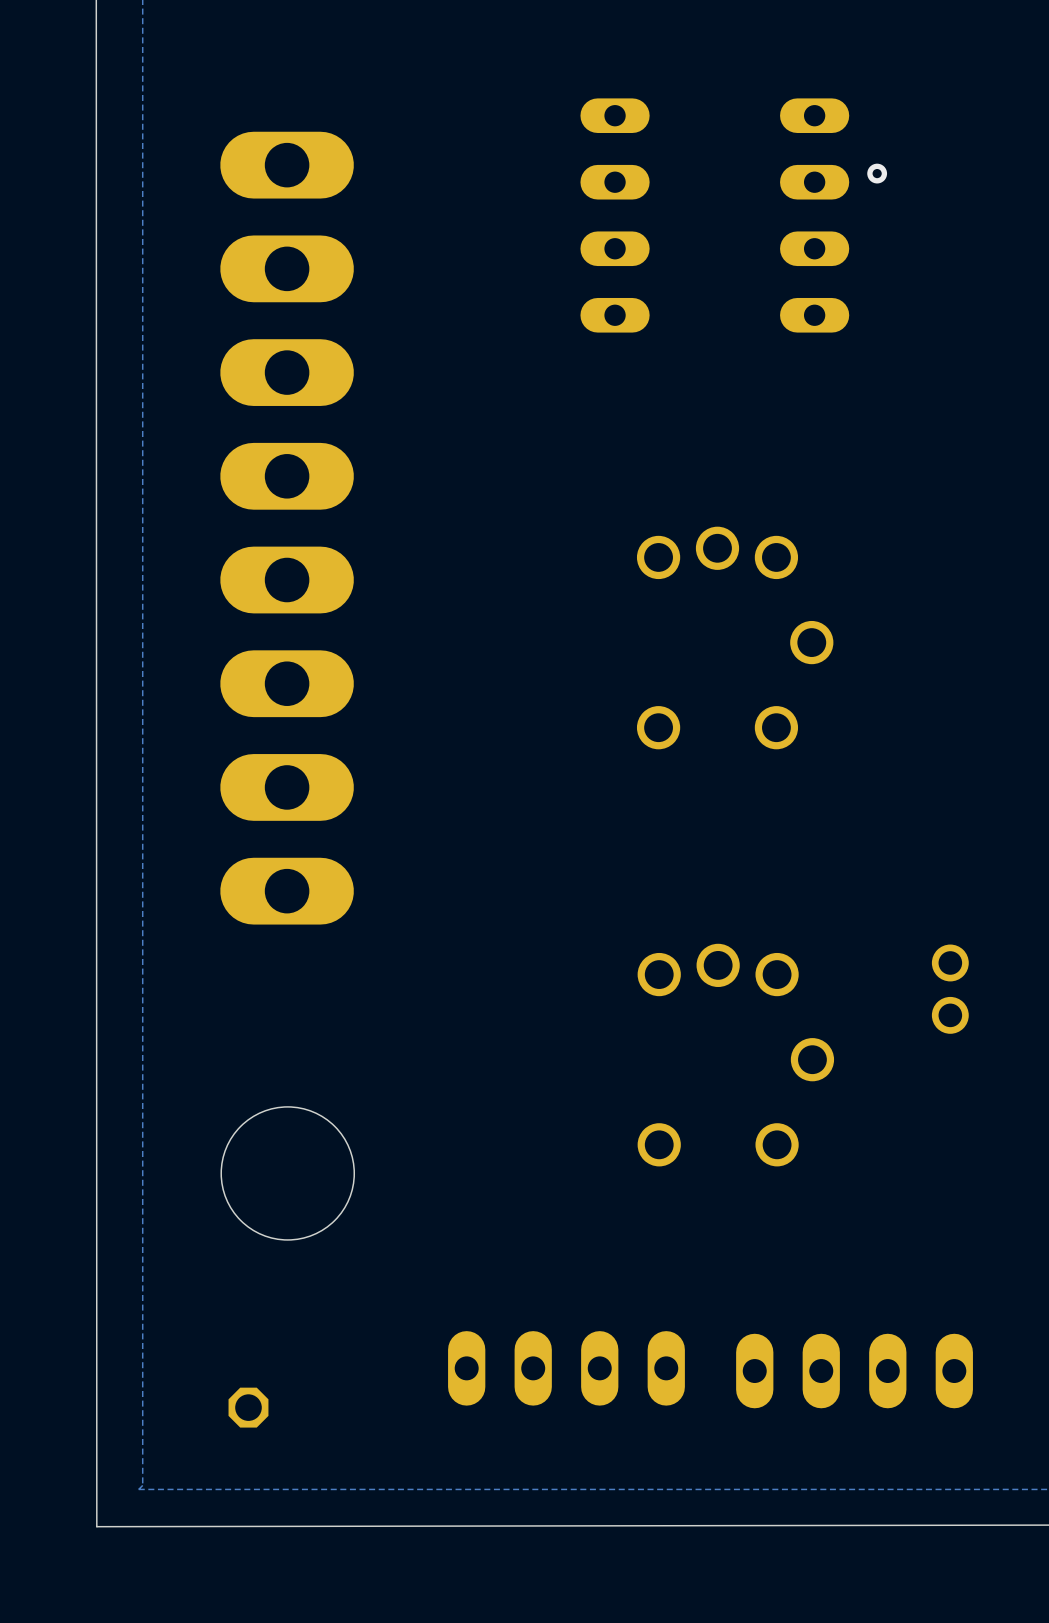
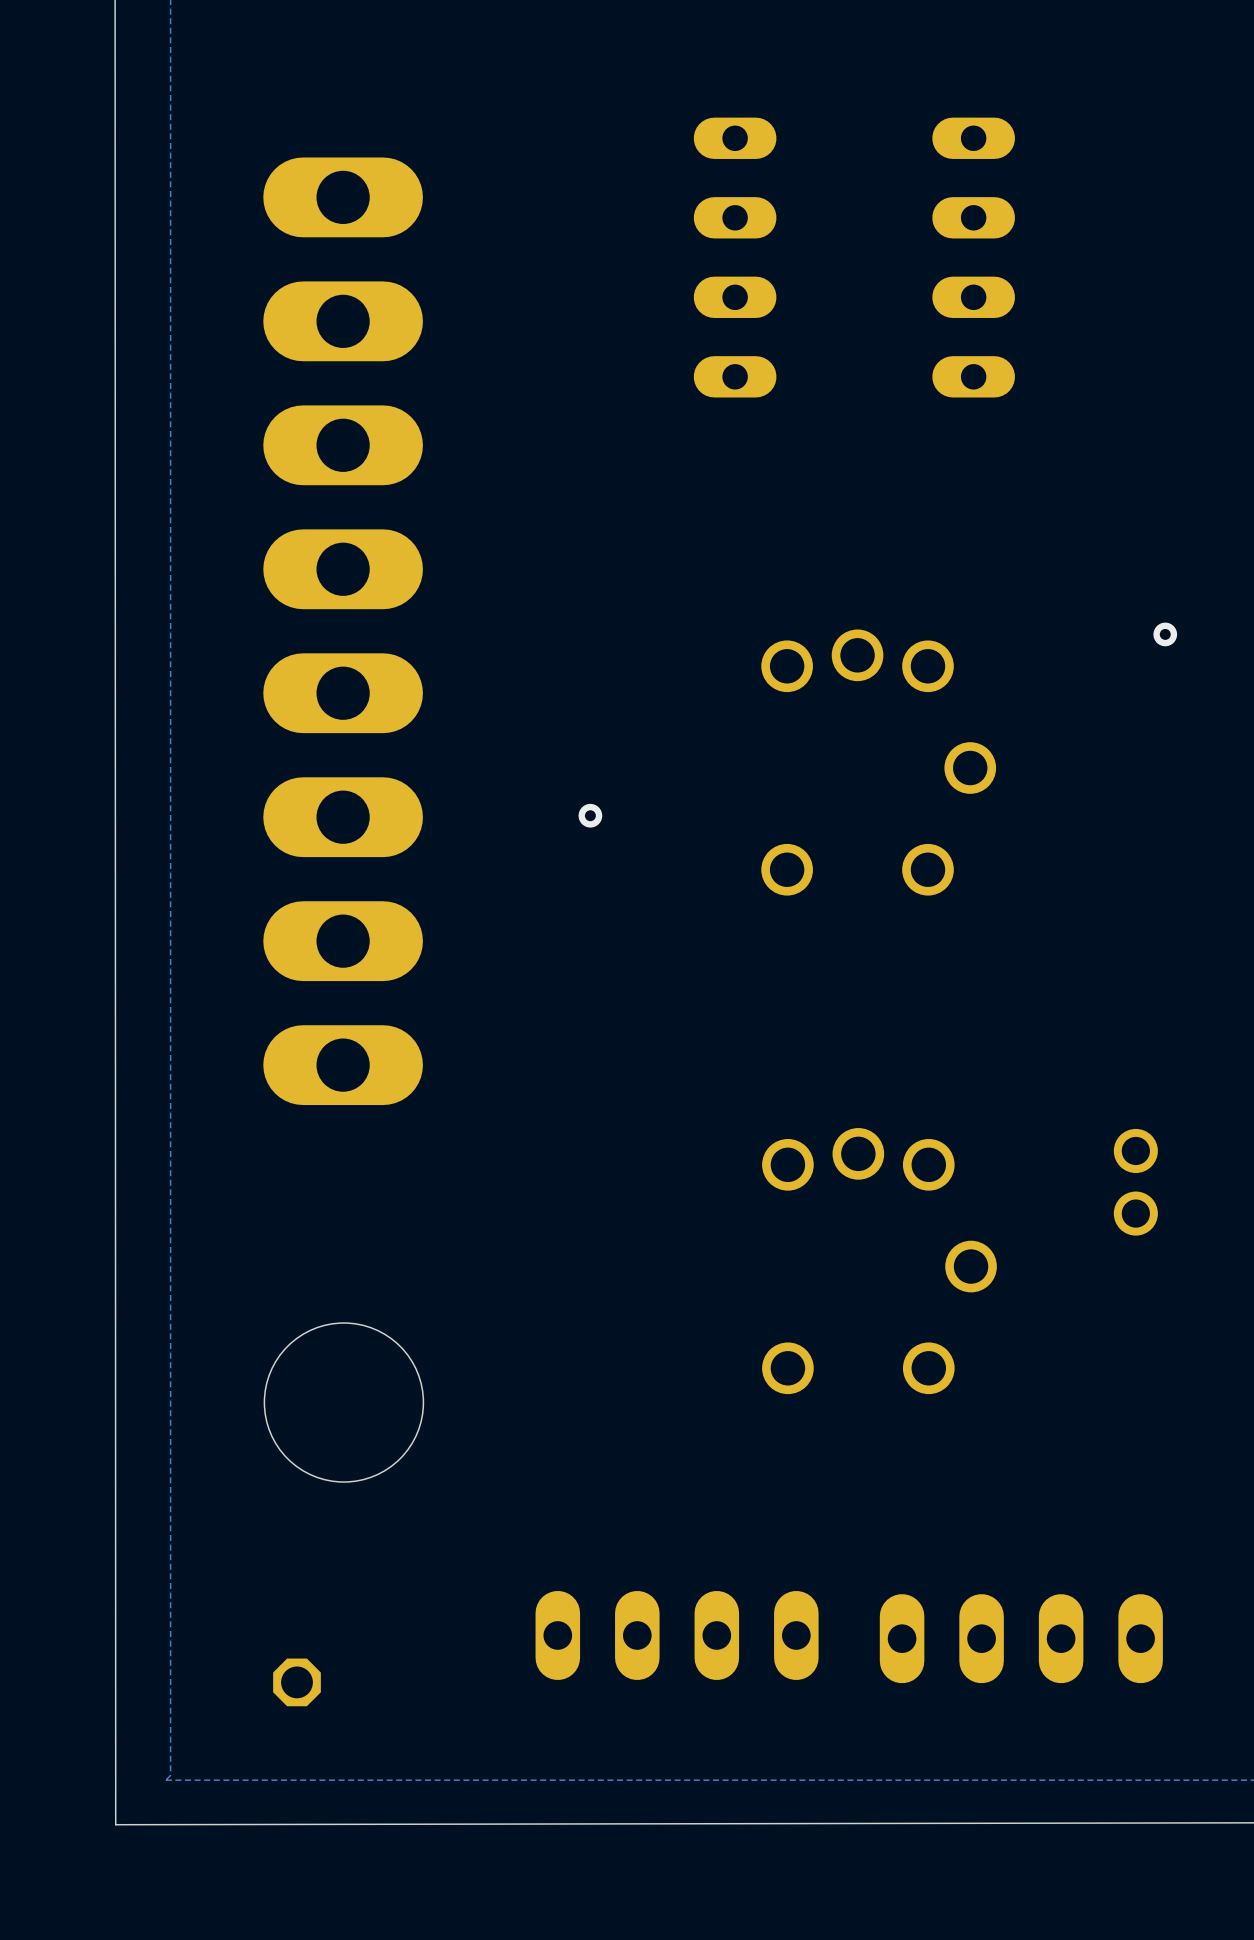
via: (877, 173) -> none
via: none -> (1165, 634)
via: none -> (590, 815)

